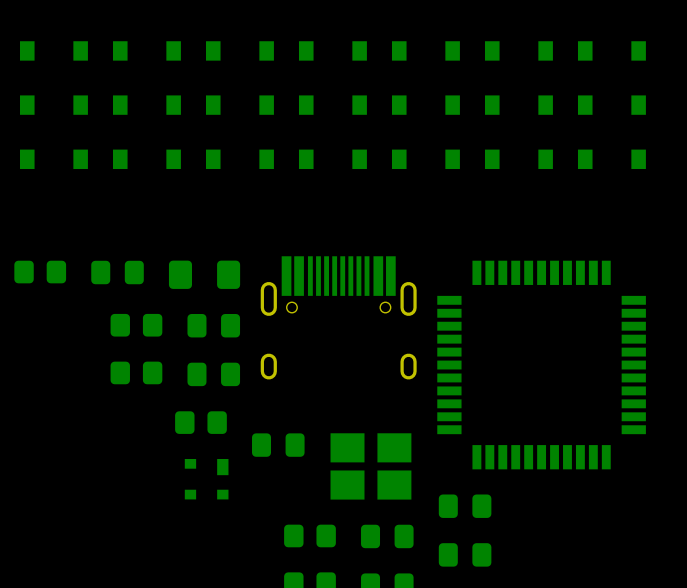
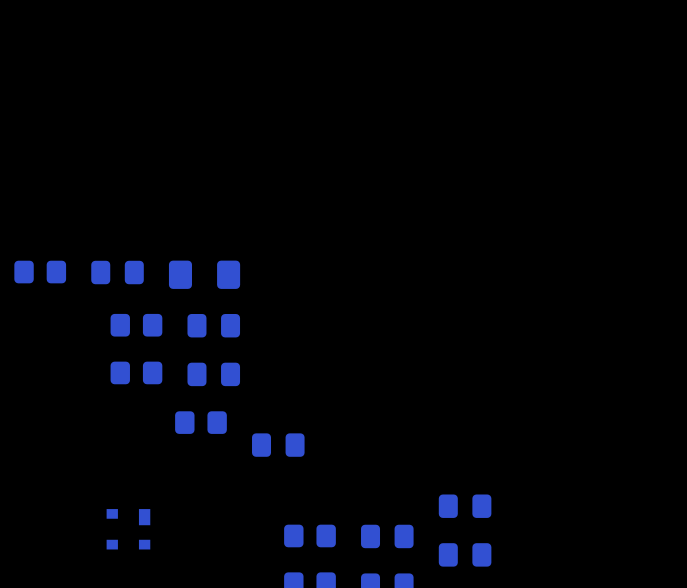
part: (53, 50) -> none
part: (146, 50) -> none
part: (239, 50) -> none
part: (332, 50) -> none
part: (425, 50) -> none
part: (518, 50) -> none
part: (611, 50) -> none
part: (53, 105) -> none
part: (146, 105) -> none
part: (239, 105) -> none
part: (332, 105) -> none
part: (425, 105) -> none
part: (518, 105) -> none
part: (611, 105) -> none
part: (53, 159) -> none
part: (146, 159) -> none
part: (239, 159) -> none
part: (332, 159) -> none
part: (425, 159) -> none
part: (518, 159) -> none
part: (611, 159) -> none
part: (338, 317) -> none
part: (541, 365) -> none
part: (370, 466) -> none
part position: (206, 479) -> (128, 529)

